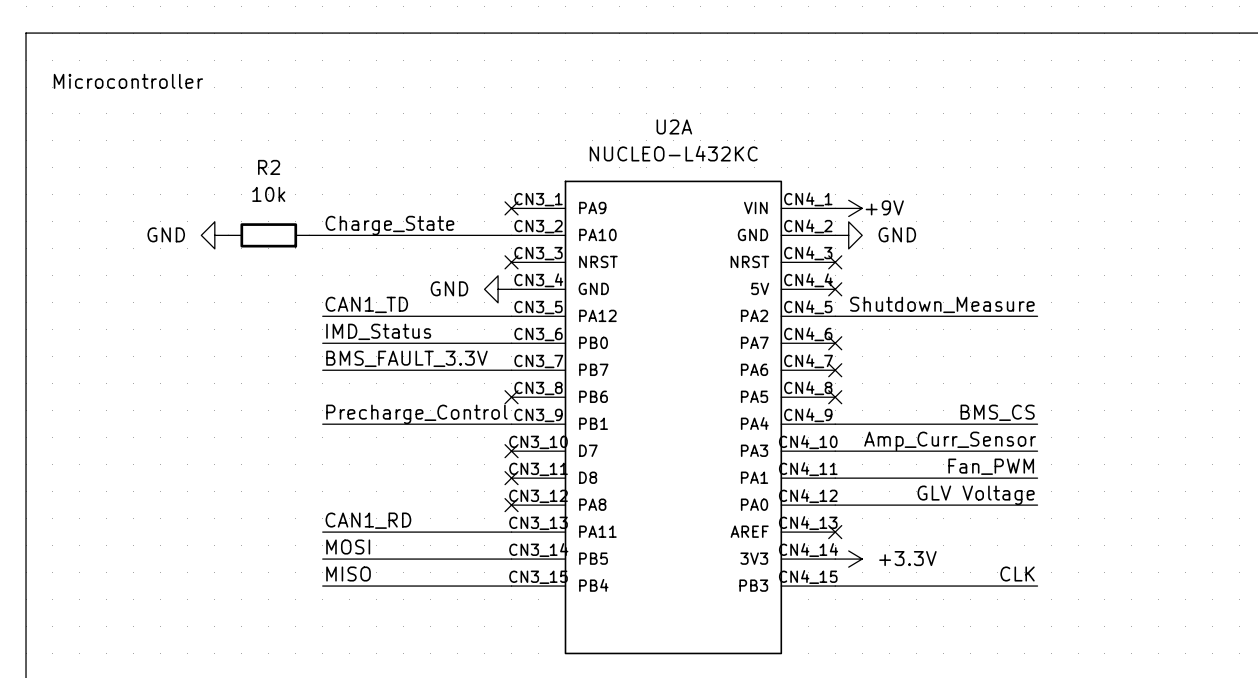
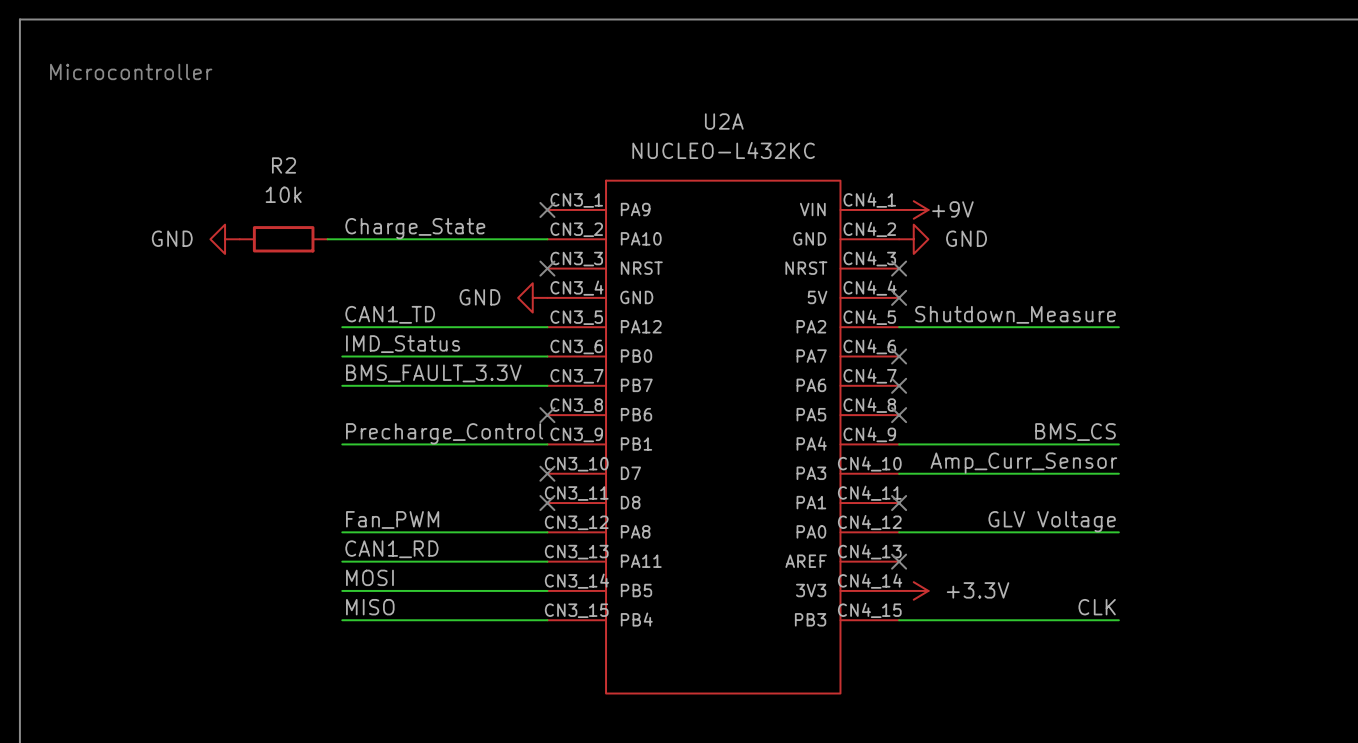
label: Fan_PWM (991, 466) -> none
wire: (835, 478) (1037, 478) -> none
no-connect mark: none -> (899, 503)
label: none -> Fan_PWM (392, 519)
wire: none -> (342, 532) (547, 532)
no-connect mark: (511, 505) -> none

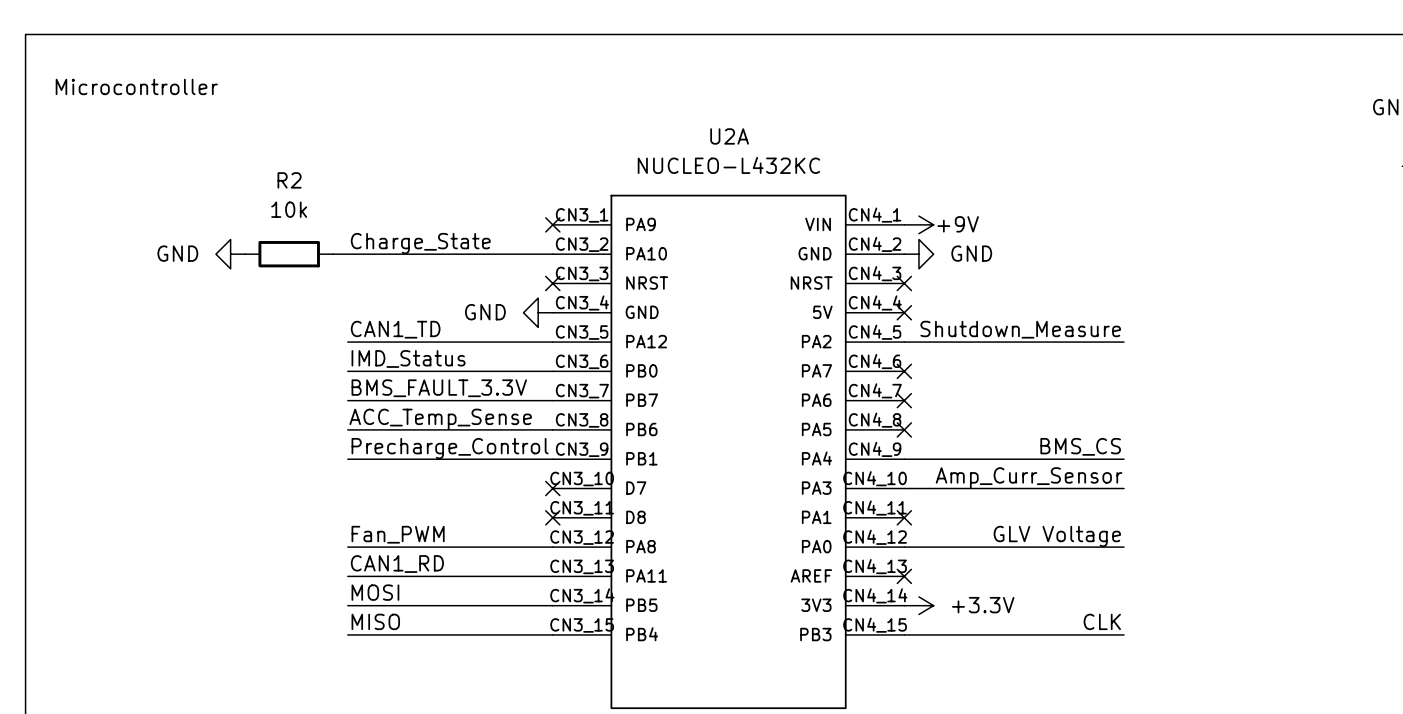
label: none -> ACC_Temp_Sense (440, 419)
wire: none -> (347, 429) (552, 429)
no-connect mark: (547, 415) -> none

